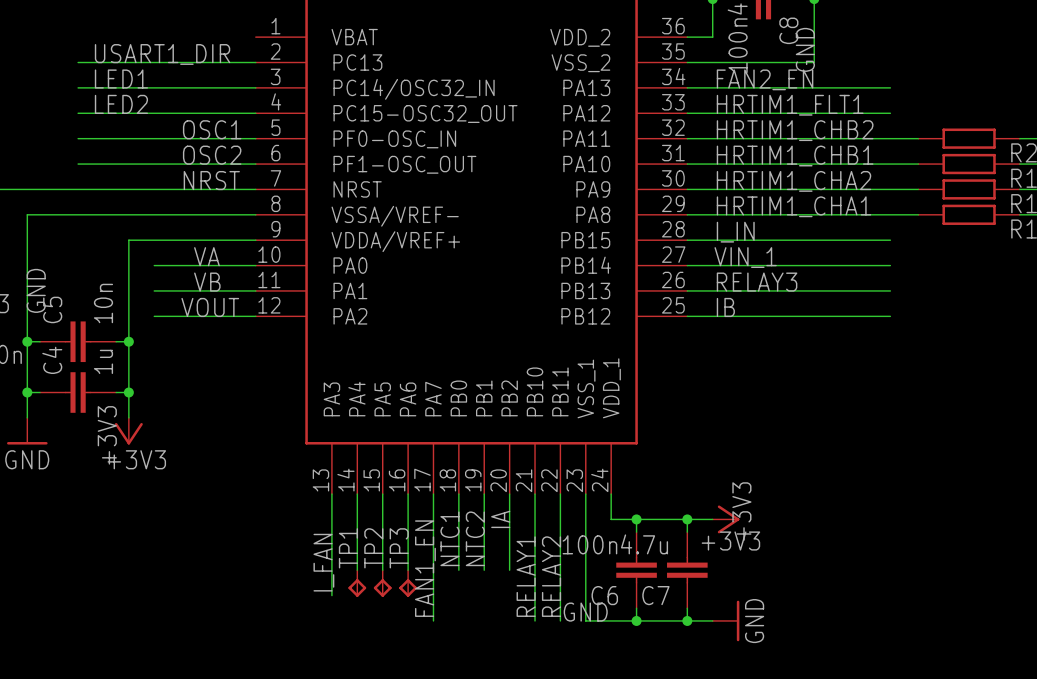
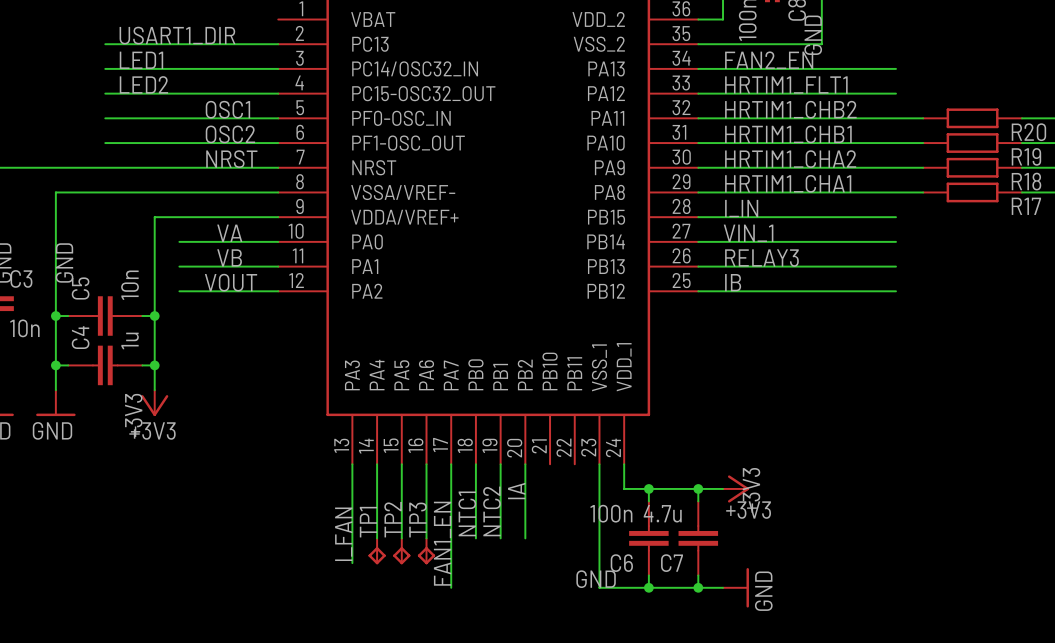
wire: (535, 494) (535, 620) -> none
wire: (560, 494) (560, 620) -> none
label: RELAY1 (526, 576) -> none
label: RELAY2 (551, 576) -> none

